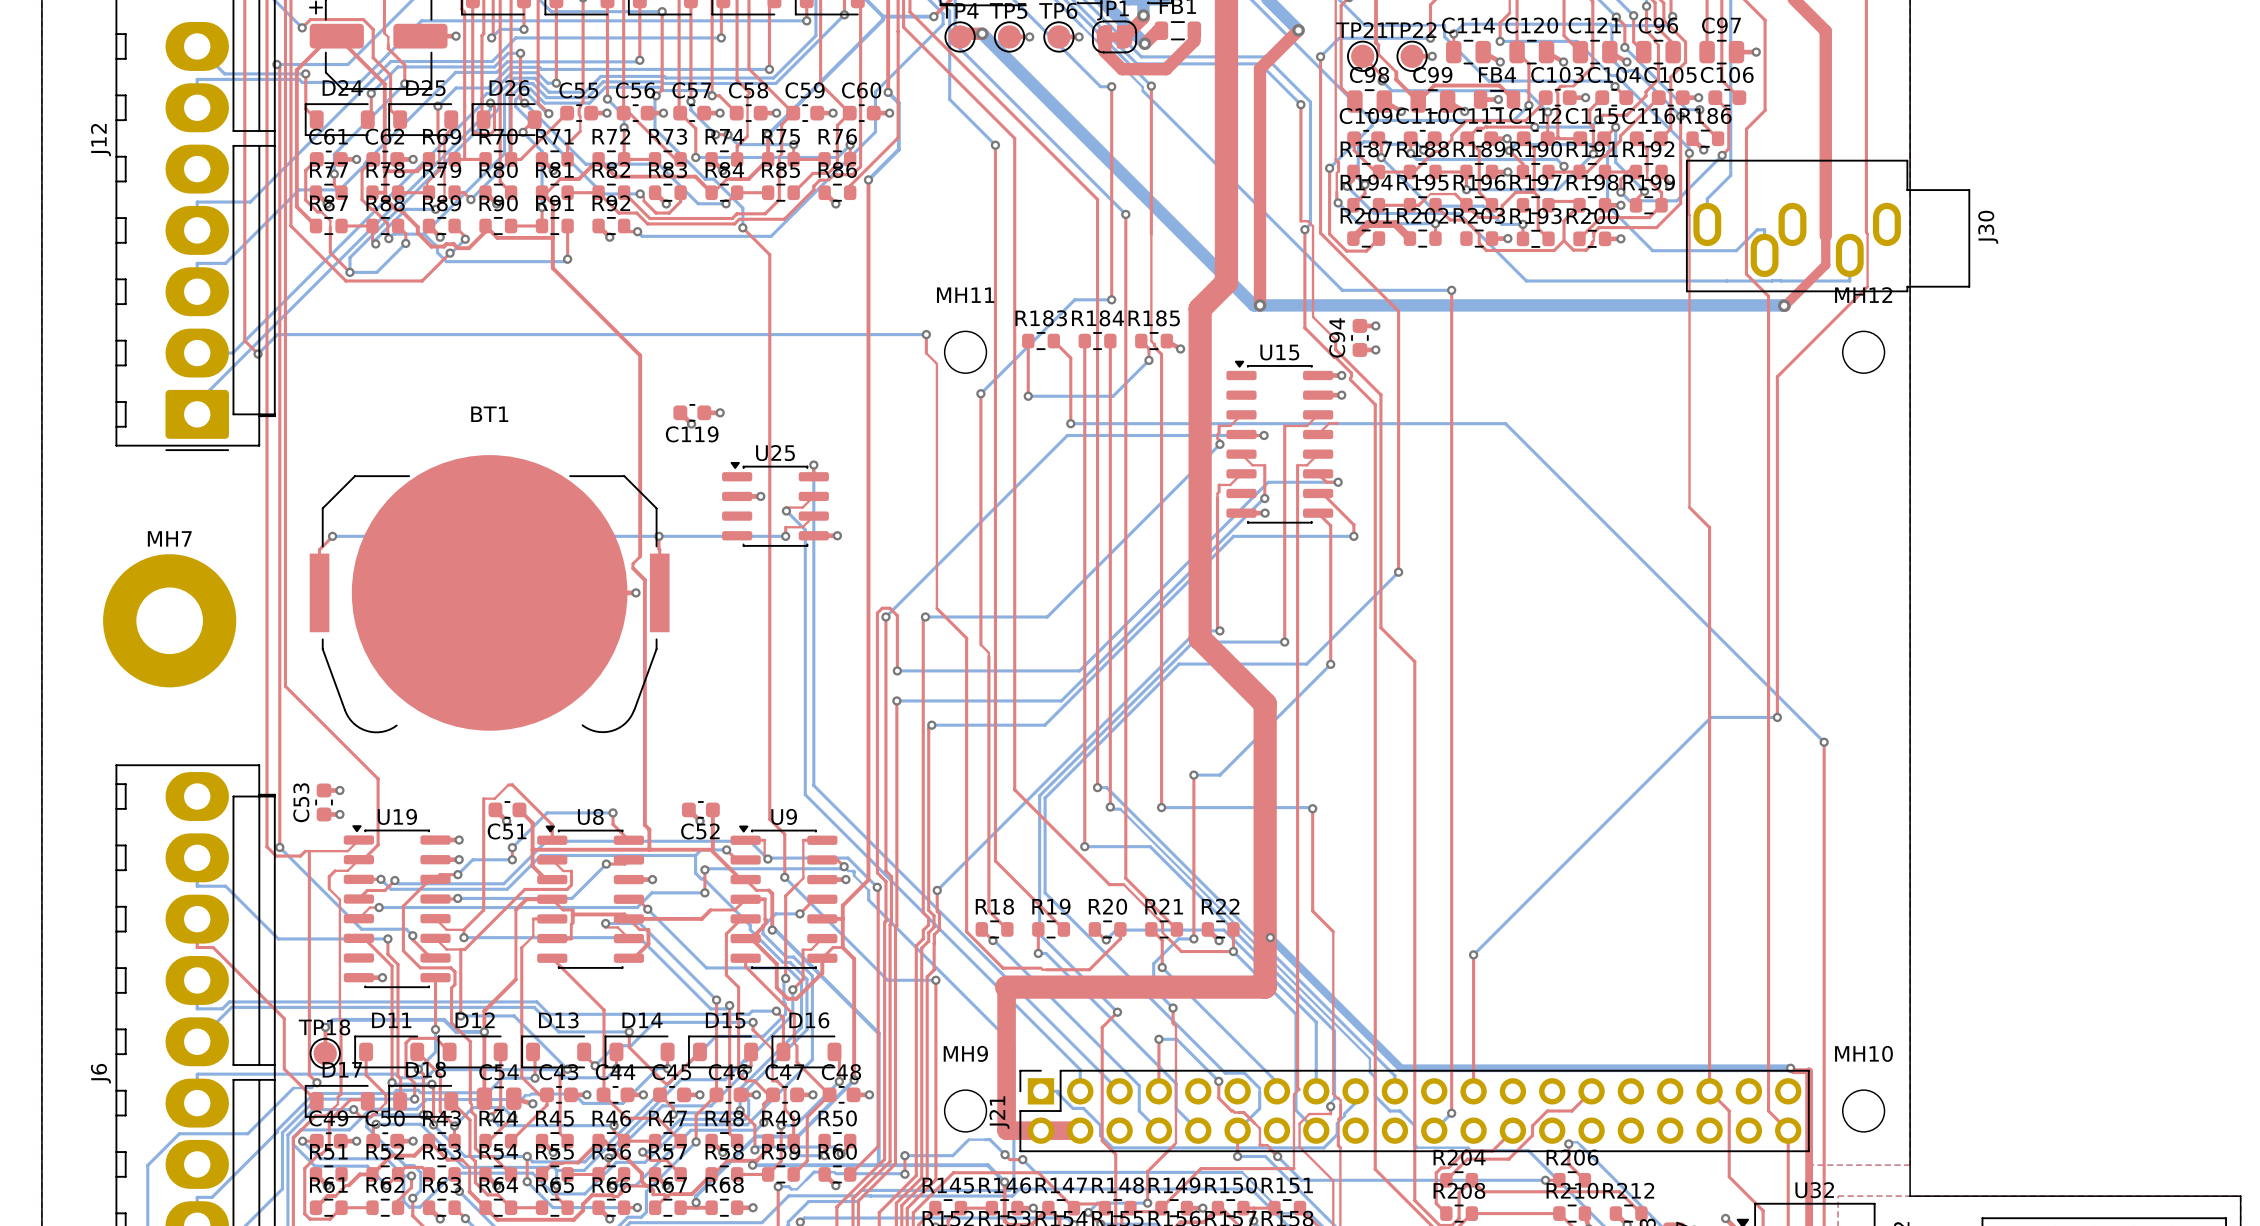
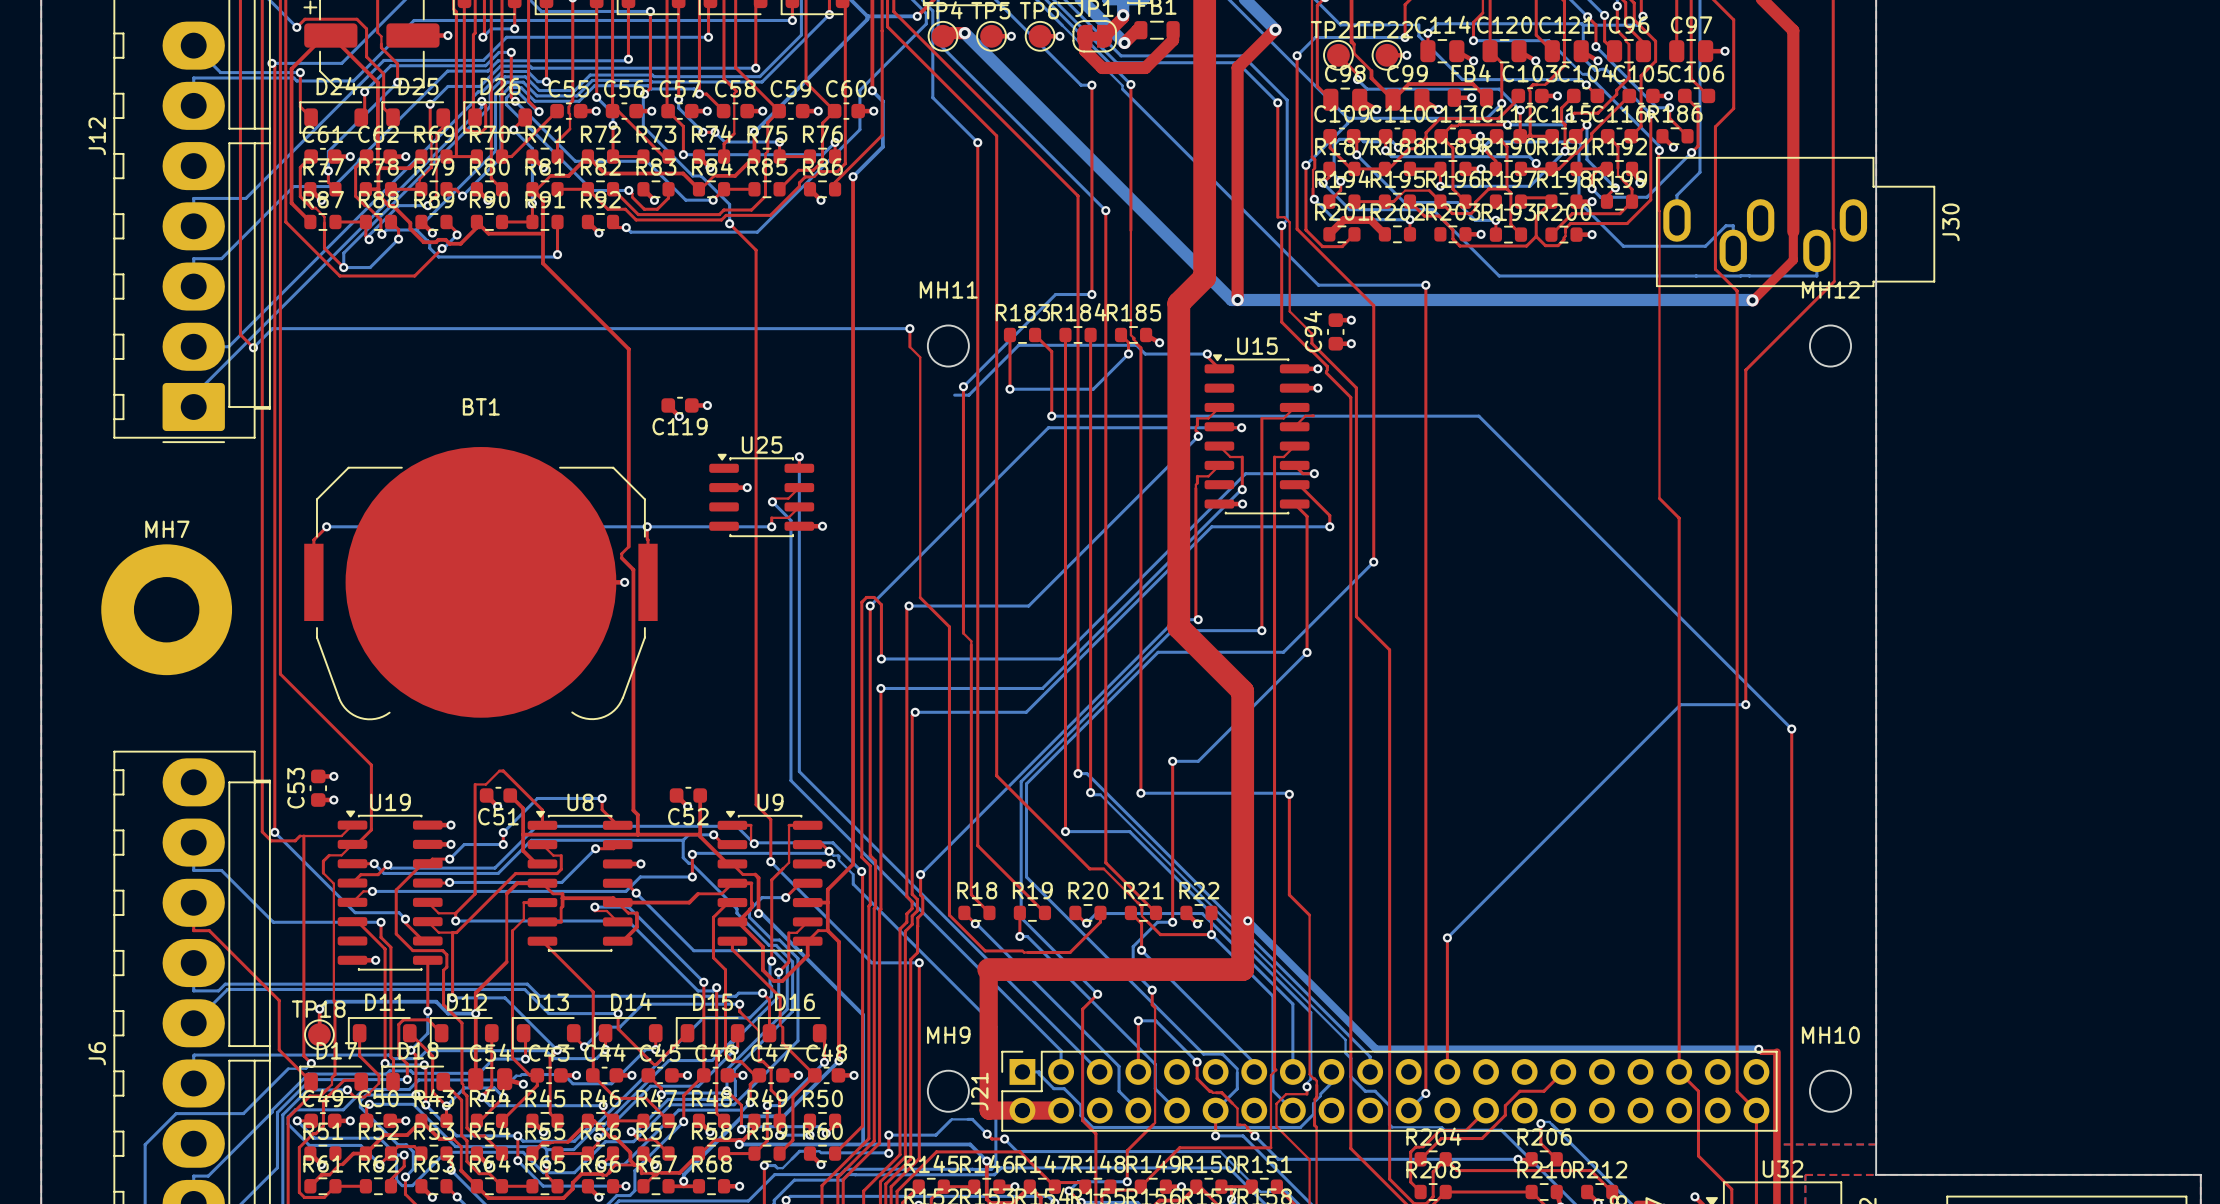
top track: none -> (1207, 354) (1207, 356) (1219, 368)
bottom track: none -> (1207, 354) (1145, 354) (1136, 345) (1018, 345) (968, 395) (954, 395)
via: none -> (1207, 354)

